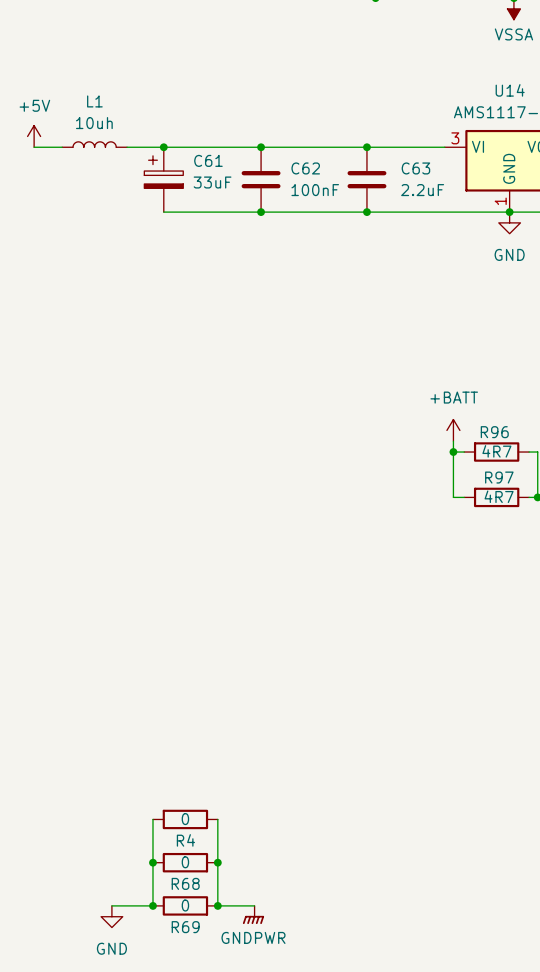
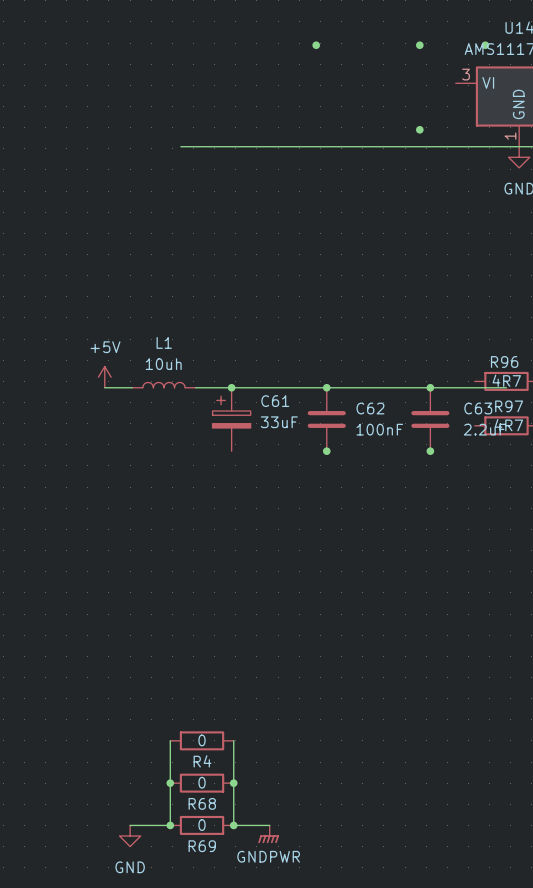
junction: none -> (316, 45)
junction: none -> (419, 45)
junction: none -> (485, 45)
power symbol: +5V (34, 136) -> none
L1 position: (94, 144) -> (163, 385)
wire: (34, 147) (62, 147) -> none
wire: (127, 147) (444, 147) -> none
junction: (163, 147) -> none
junction: (261, 147) -> none
junction: (366, 147) -> none
C61 position: (163, 179) -> (231, 419)
C62 position: (261, 179) -> (326, 419)
C63 position: (366, 179) -> (430, 419)
junction: none -> (419, 129)
junction: (261, 212) -> none
junction: (366, 212) -> none
junction: (509, 212) -> none
power symbol: +BATT (453, 430) -> none
wire: (453, 441) (453, 497) (464, 497) -> none
power symbol: none -> +5V (104, 377)
wire: (453, 452) (464, 452) -> none
junction position: (453, 452) -> (430, 387)
wire: none -> (104, 387) (132, 387)
wire: none -> (195, 387) (506, 387)
junction: none -> (231, 387)
junction: none -> (326, 387)
junction: none -> (326, 451)
junction: none -> (430, 451)

